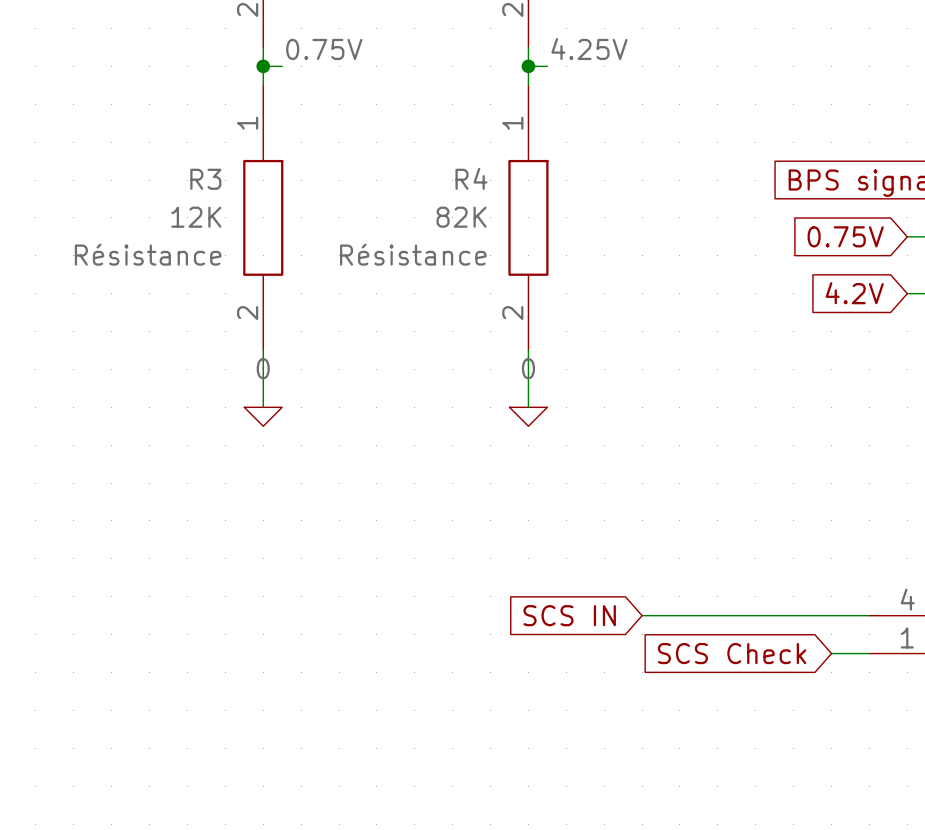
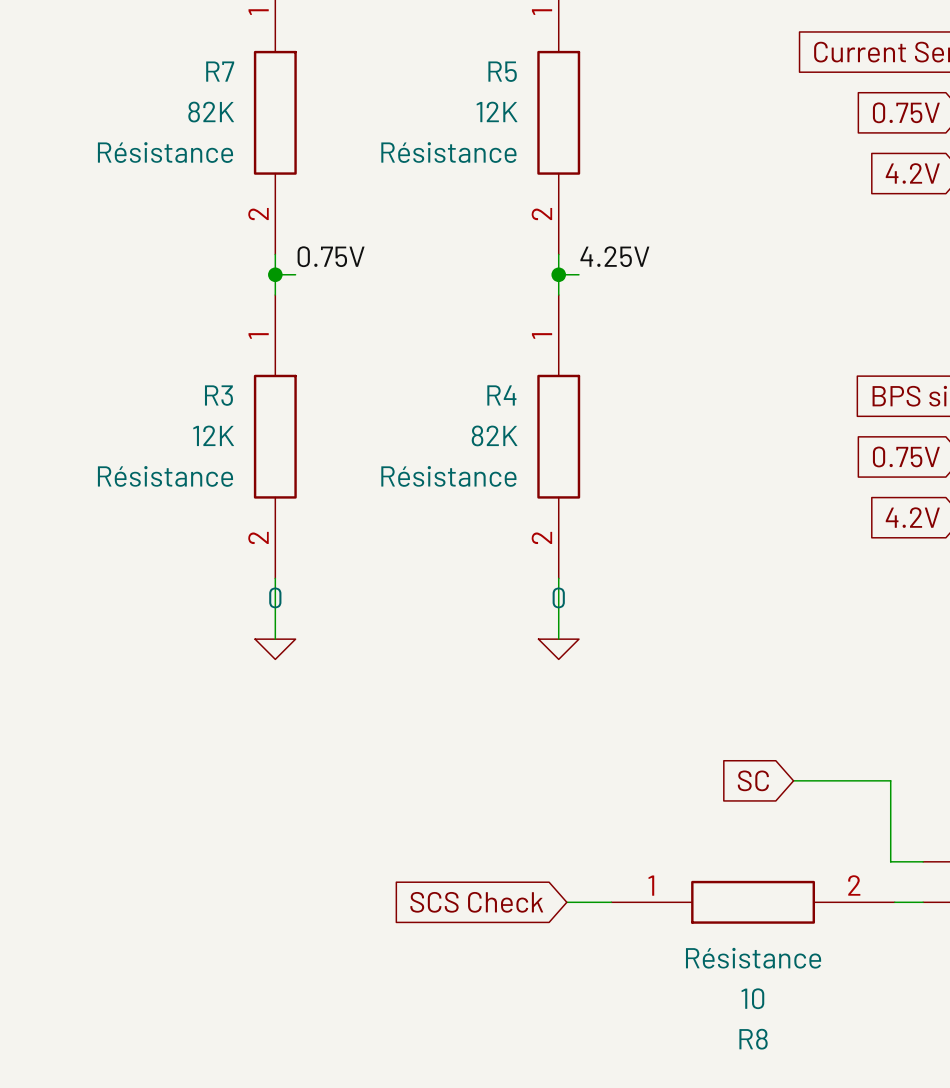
global label: none -> SC (753, 780)
global label: SCS IN (569, 615) -> none
wire: (642, 615) (839, 615) -> (793, 780) (890, 780) (890, 861)
wire: none -> (566, 902) (611, 902)
R8: none -> 10 (753, 902)
global label position: SCS Check (732, 653) -> SCS Check (476, 902)

